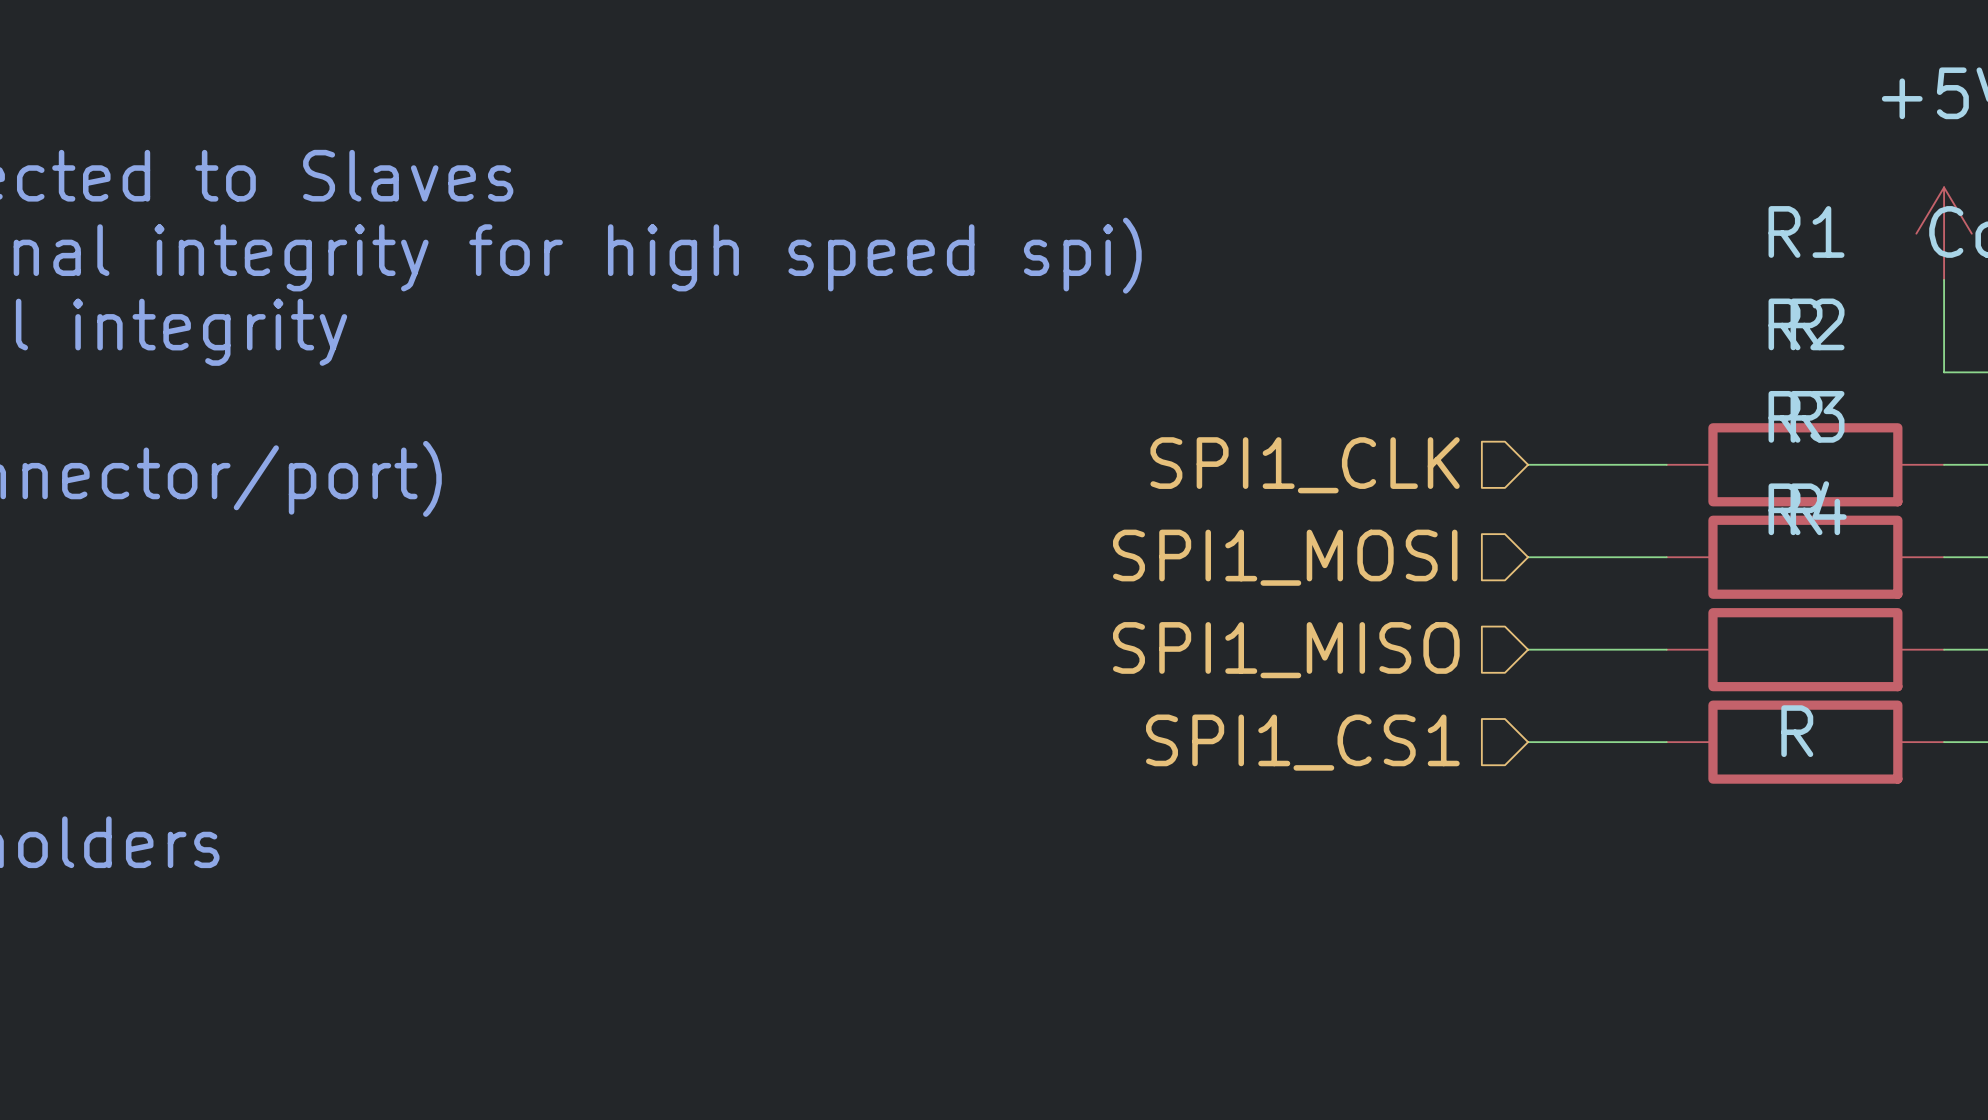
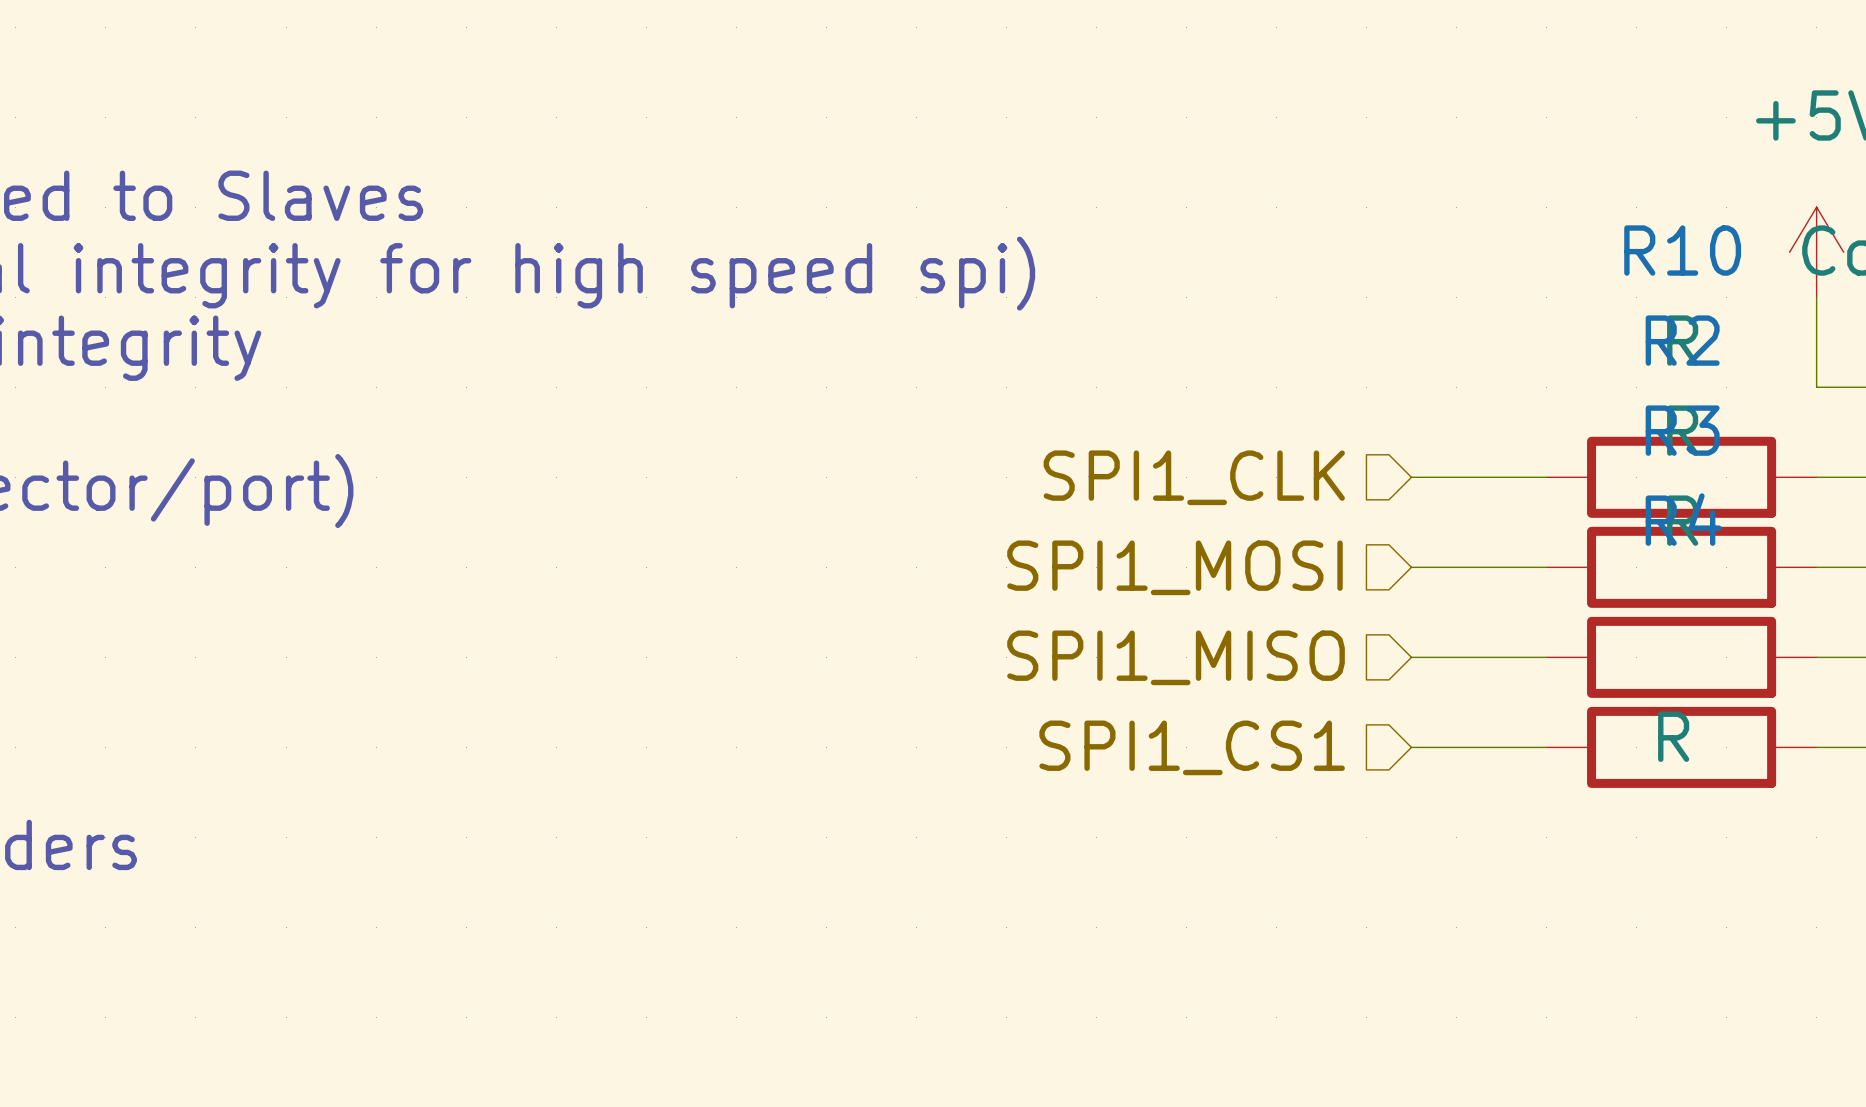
R1 name: R1 (1806, 231) -> R10 (1682, 250)

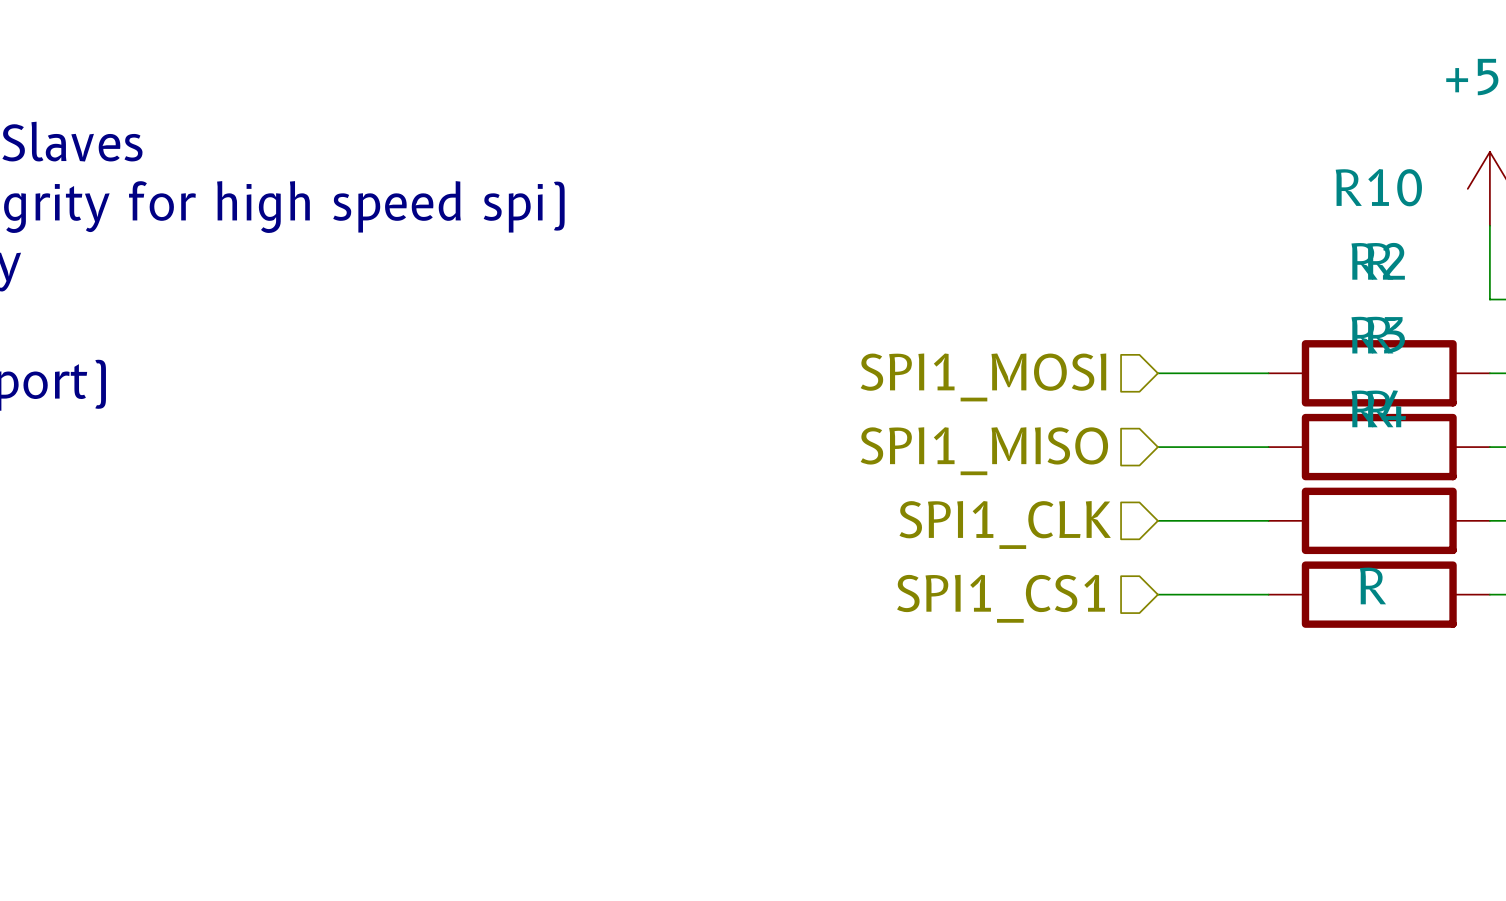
hierarchical label: SPI1_CLK (1194, 477) -> SPI1_MOSI (983, 377)
hierarchical label: SPI1_MOSI (1174, 567) -> SPI1_MISO (984, 451)
hierarchical label: SPI1_MISO (1176, 657) -> SPI1_CLK (1005, 525)

